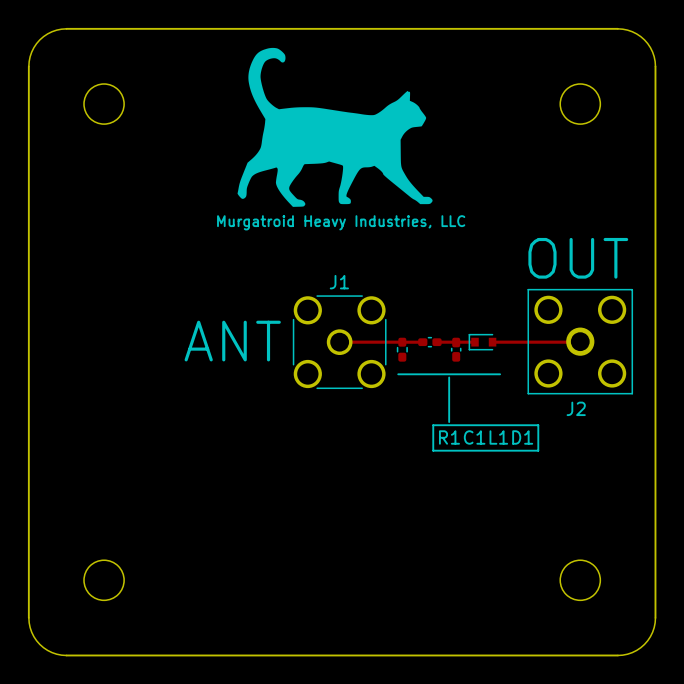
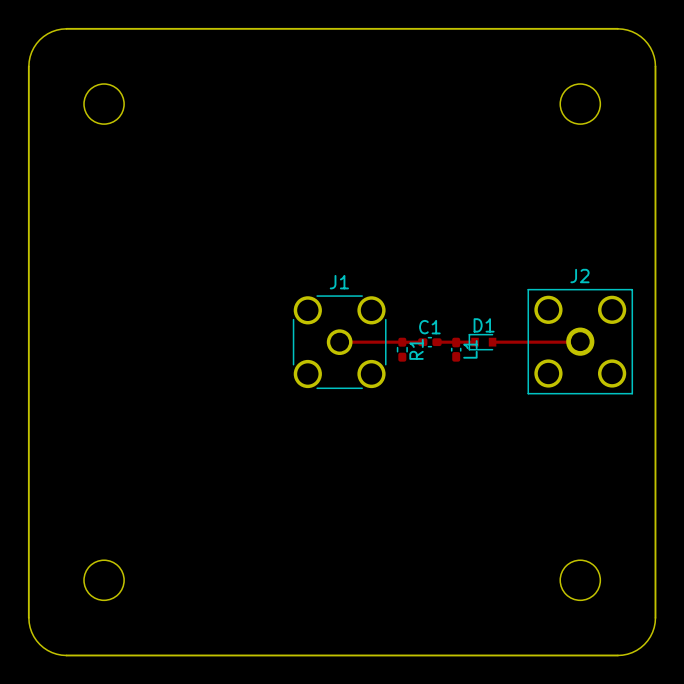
drawing: [237, 47, 433, 207] -> none
text: Murgatroid Heavy Industries, LLC (341, 222) -> none
text: OUT (578, 258) -> none
text: ANT (232, 341) -> none
line: (398, 374) (500, 374) -> none
line: (449, 377) (449, 422) -> none
J2 name position: J2 (576, 408) -> J2 (579, 276)
line: (433, 425) (538, 425) (538, 450) (433, 450) (433, 425) -> none
R1 name rotation: 0° (449, 437) -> 90° counterclockwise (416, 349)
R1 name position: R1 (449, 437) -> R1 (416, 349)
C1 name position: C1 (474, 437) -> C1 (429, 327)
L1 name rotation: 0° (498, 437) -> 90° counterclockwise (470, 349)
L1 name position: L1 (498, 437) -> L1 (470, 349)
D1 name position: D1 (522, 437) -> D1 (484, 325)

